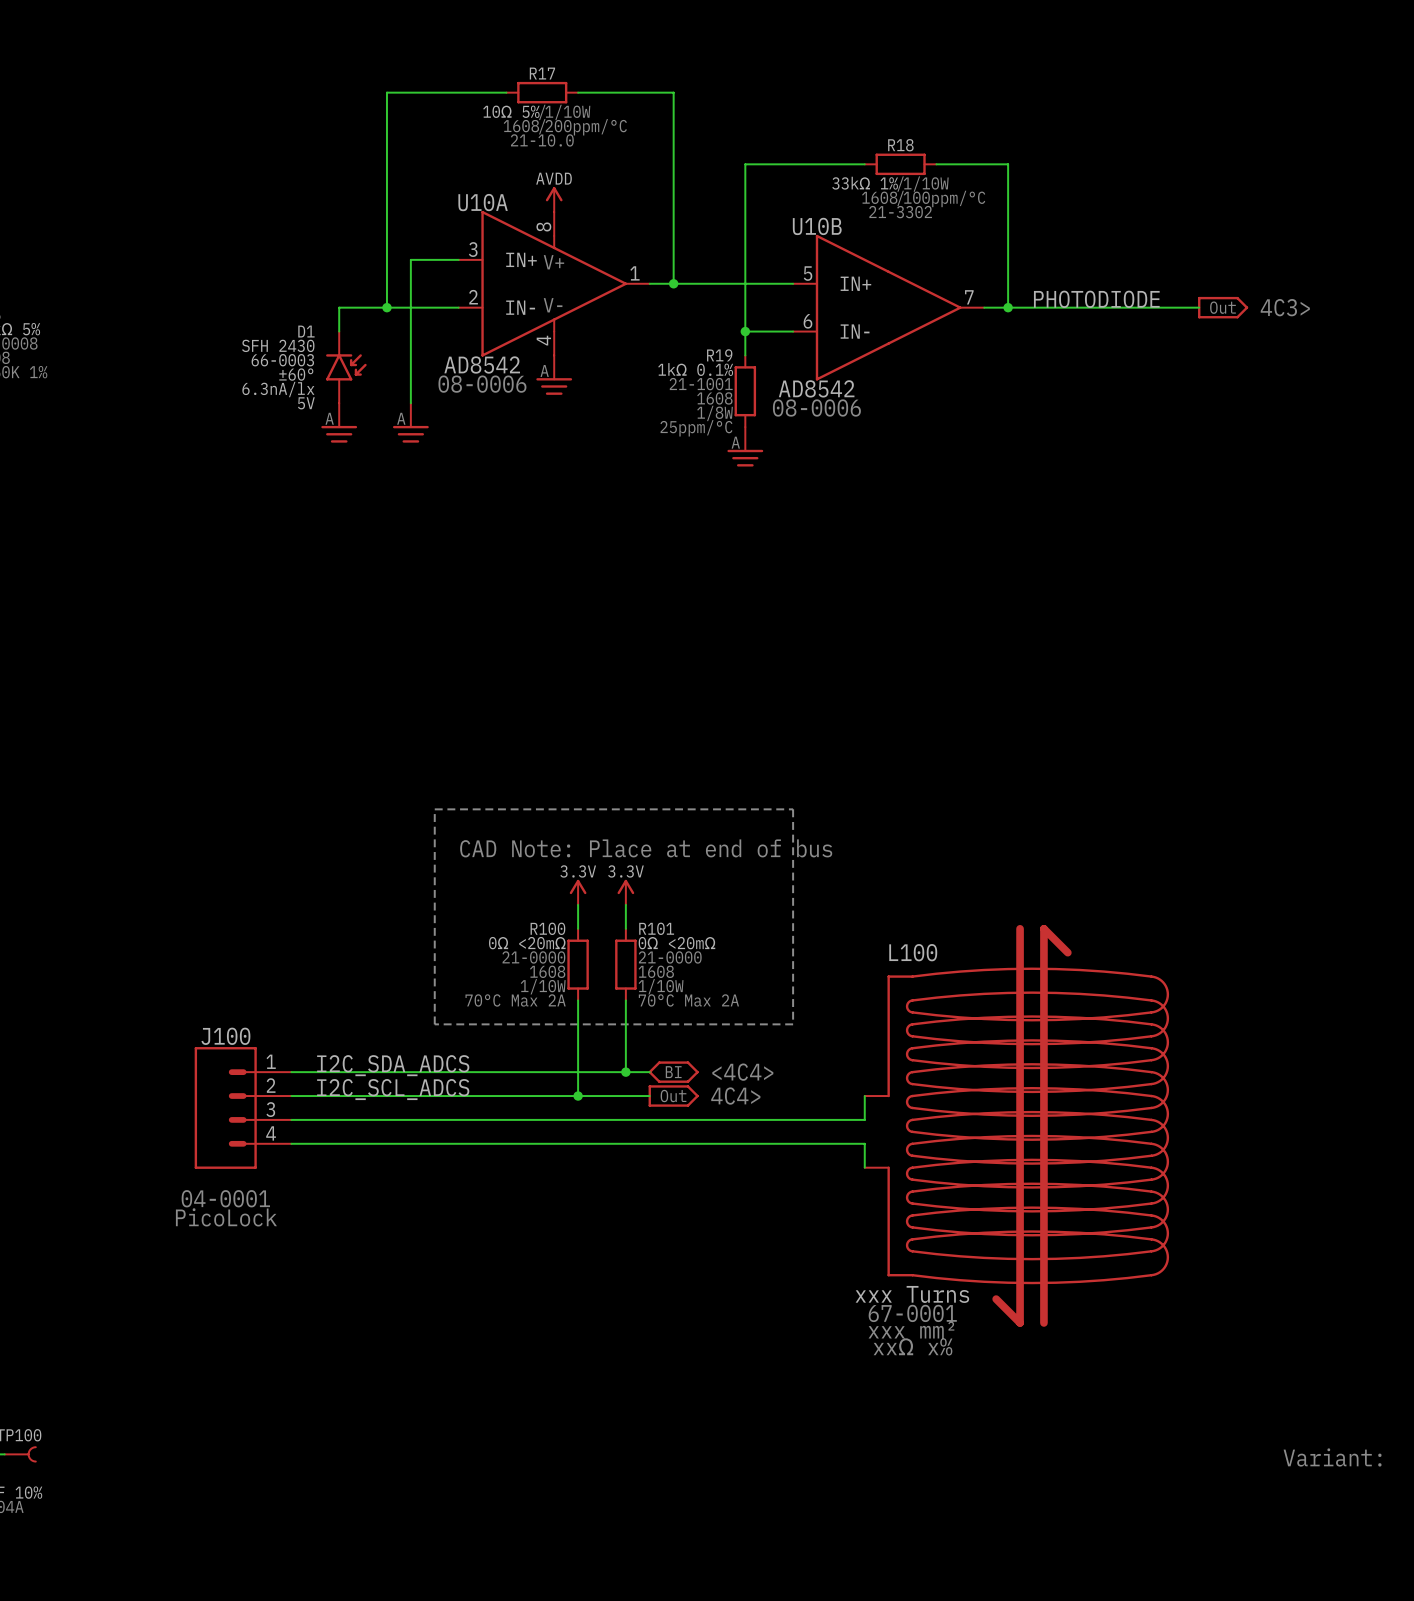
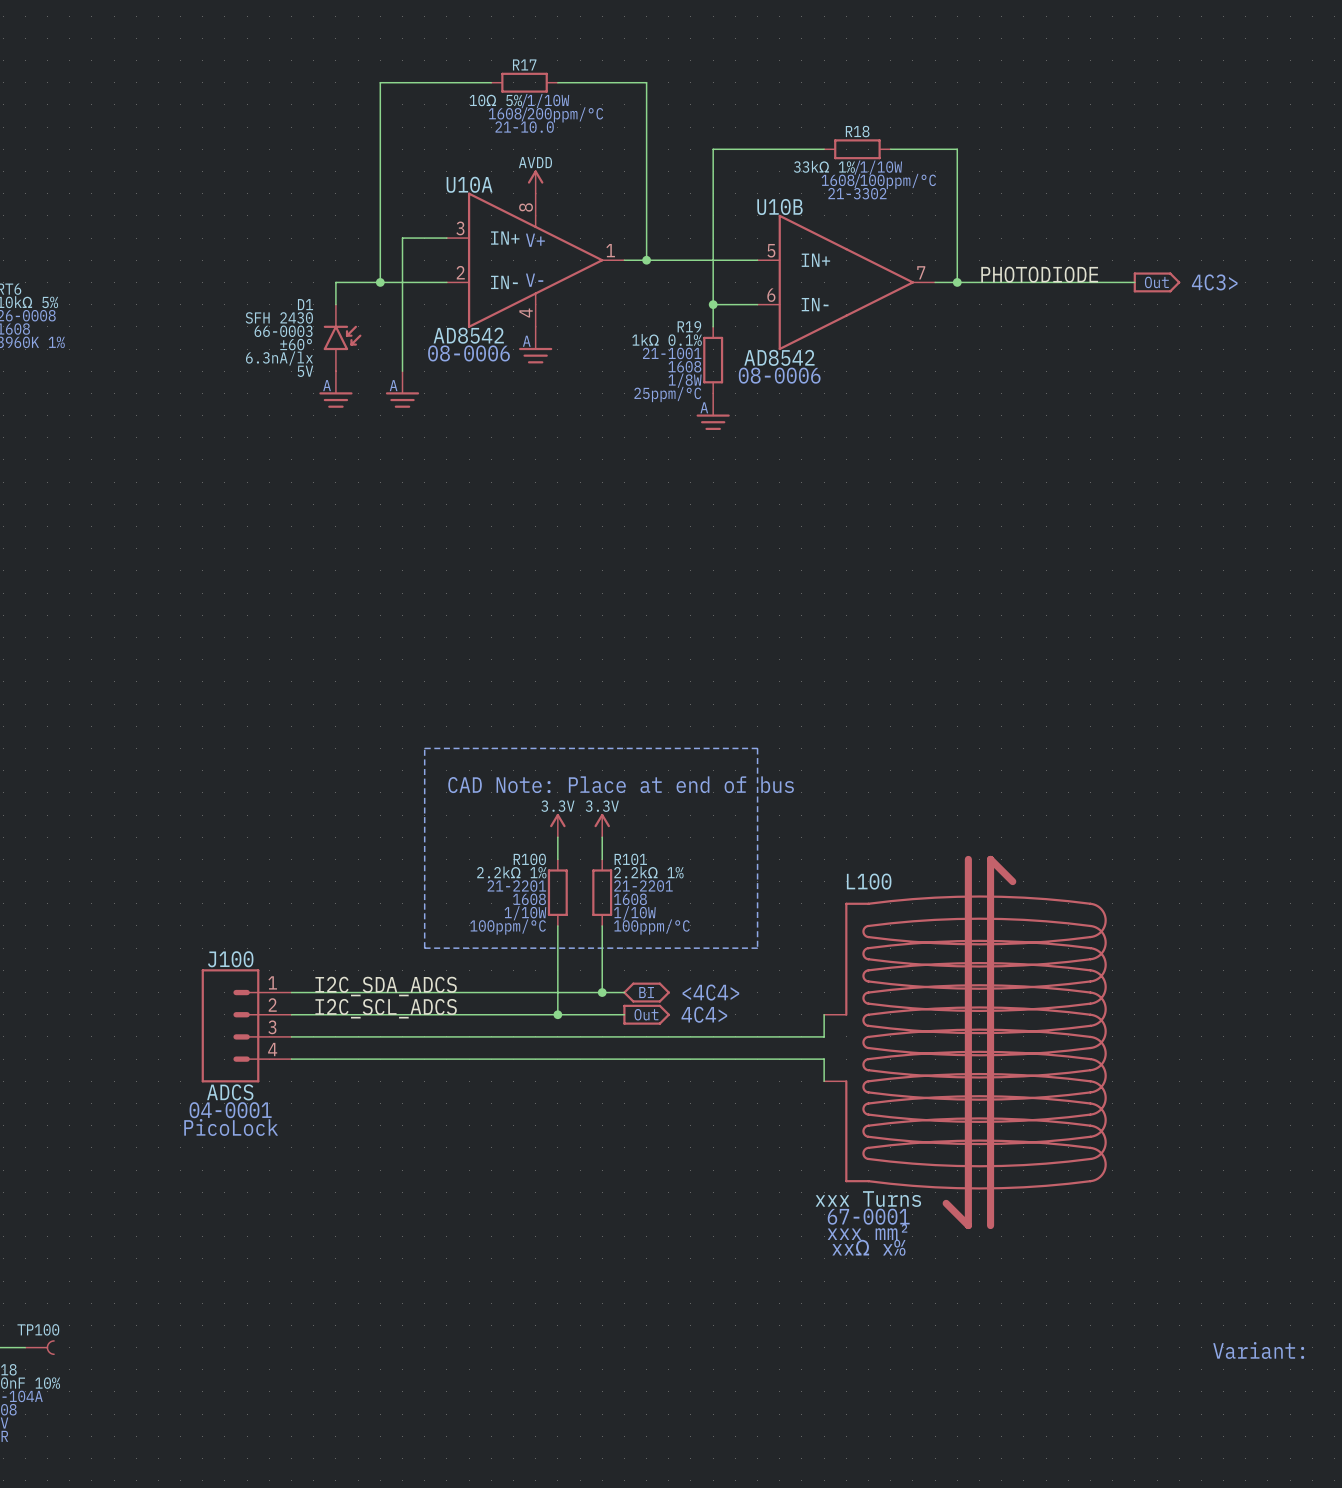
R100 value: 0Ω <20mΩ (527, 943) -> 2.2kΩ 1% (511, 872)
R101 value: 0Ω <20mΩ (676, 943) -> 2.2kΩ 1% (648, 872)
R100 text: 21-0000 (533, 957) -> 21-2201 (516, 886)
R101 text: 21-0000 (670, 957) -> 21-2201 (643, 886)
R100 text: 70°C Max 2A (515, 1000) -> 100ppm/°C (508, 927)
R101 text: 70°C Max 2A (688, 1000) -> 100ppm/°C (651, 927)
J100 value: none -> ADCS (230, 1092)

